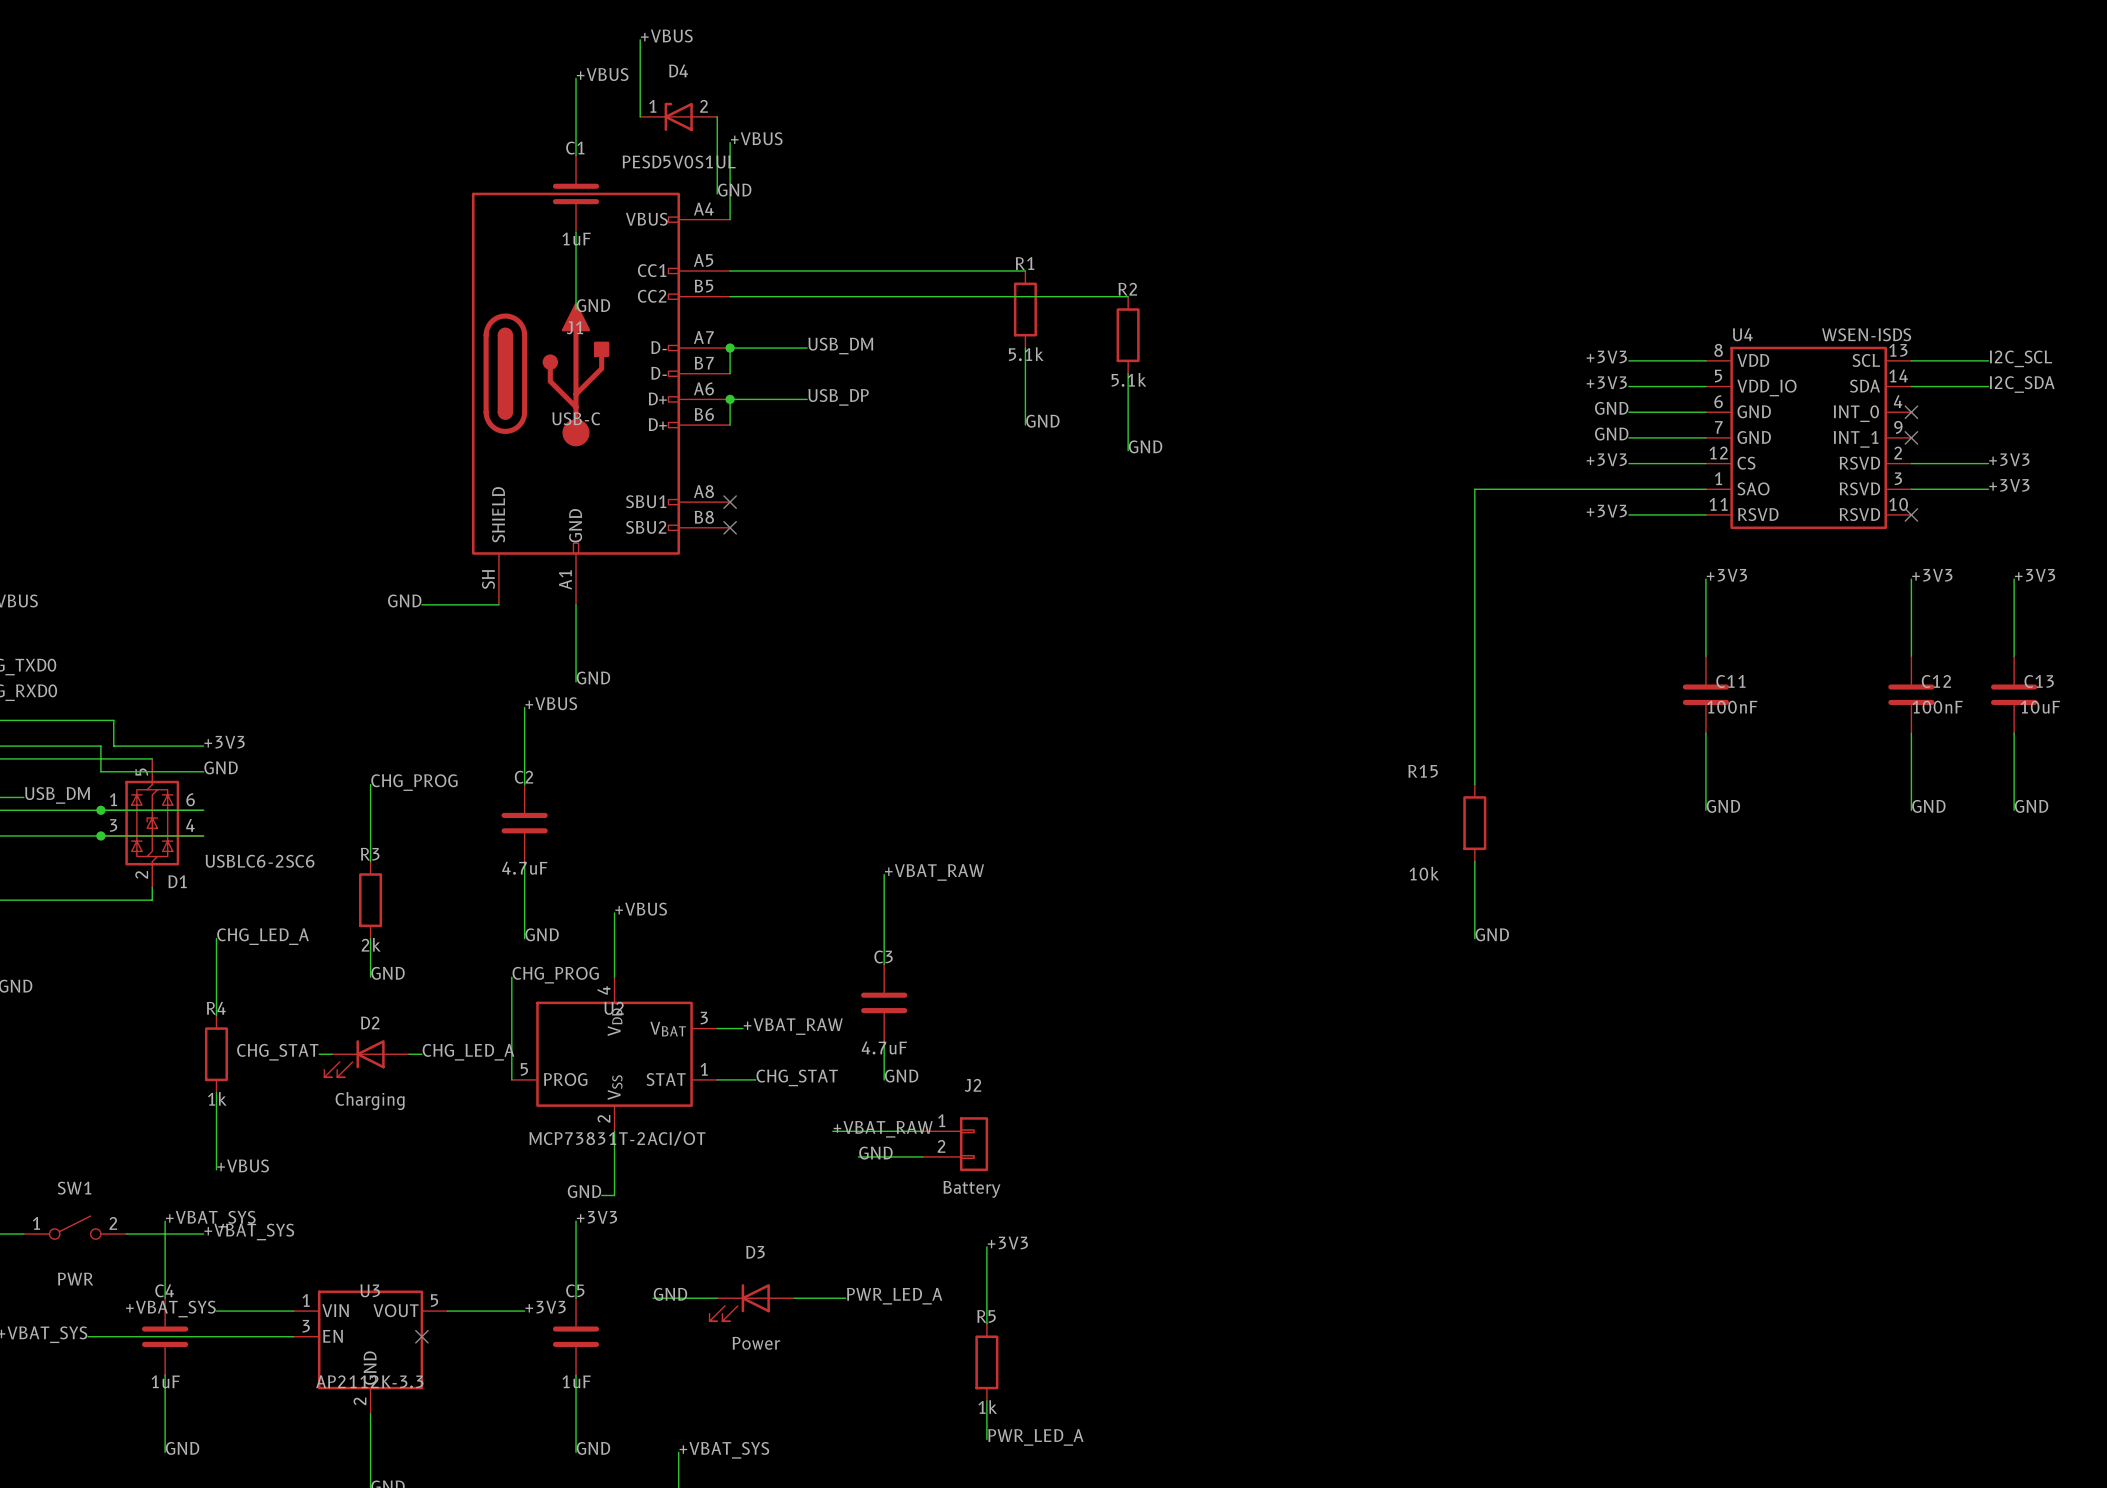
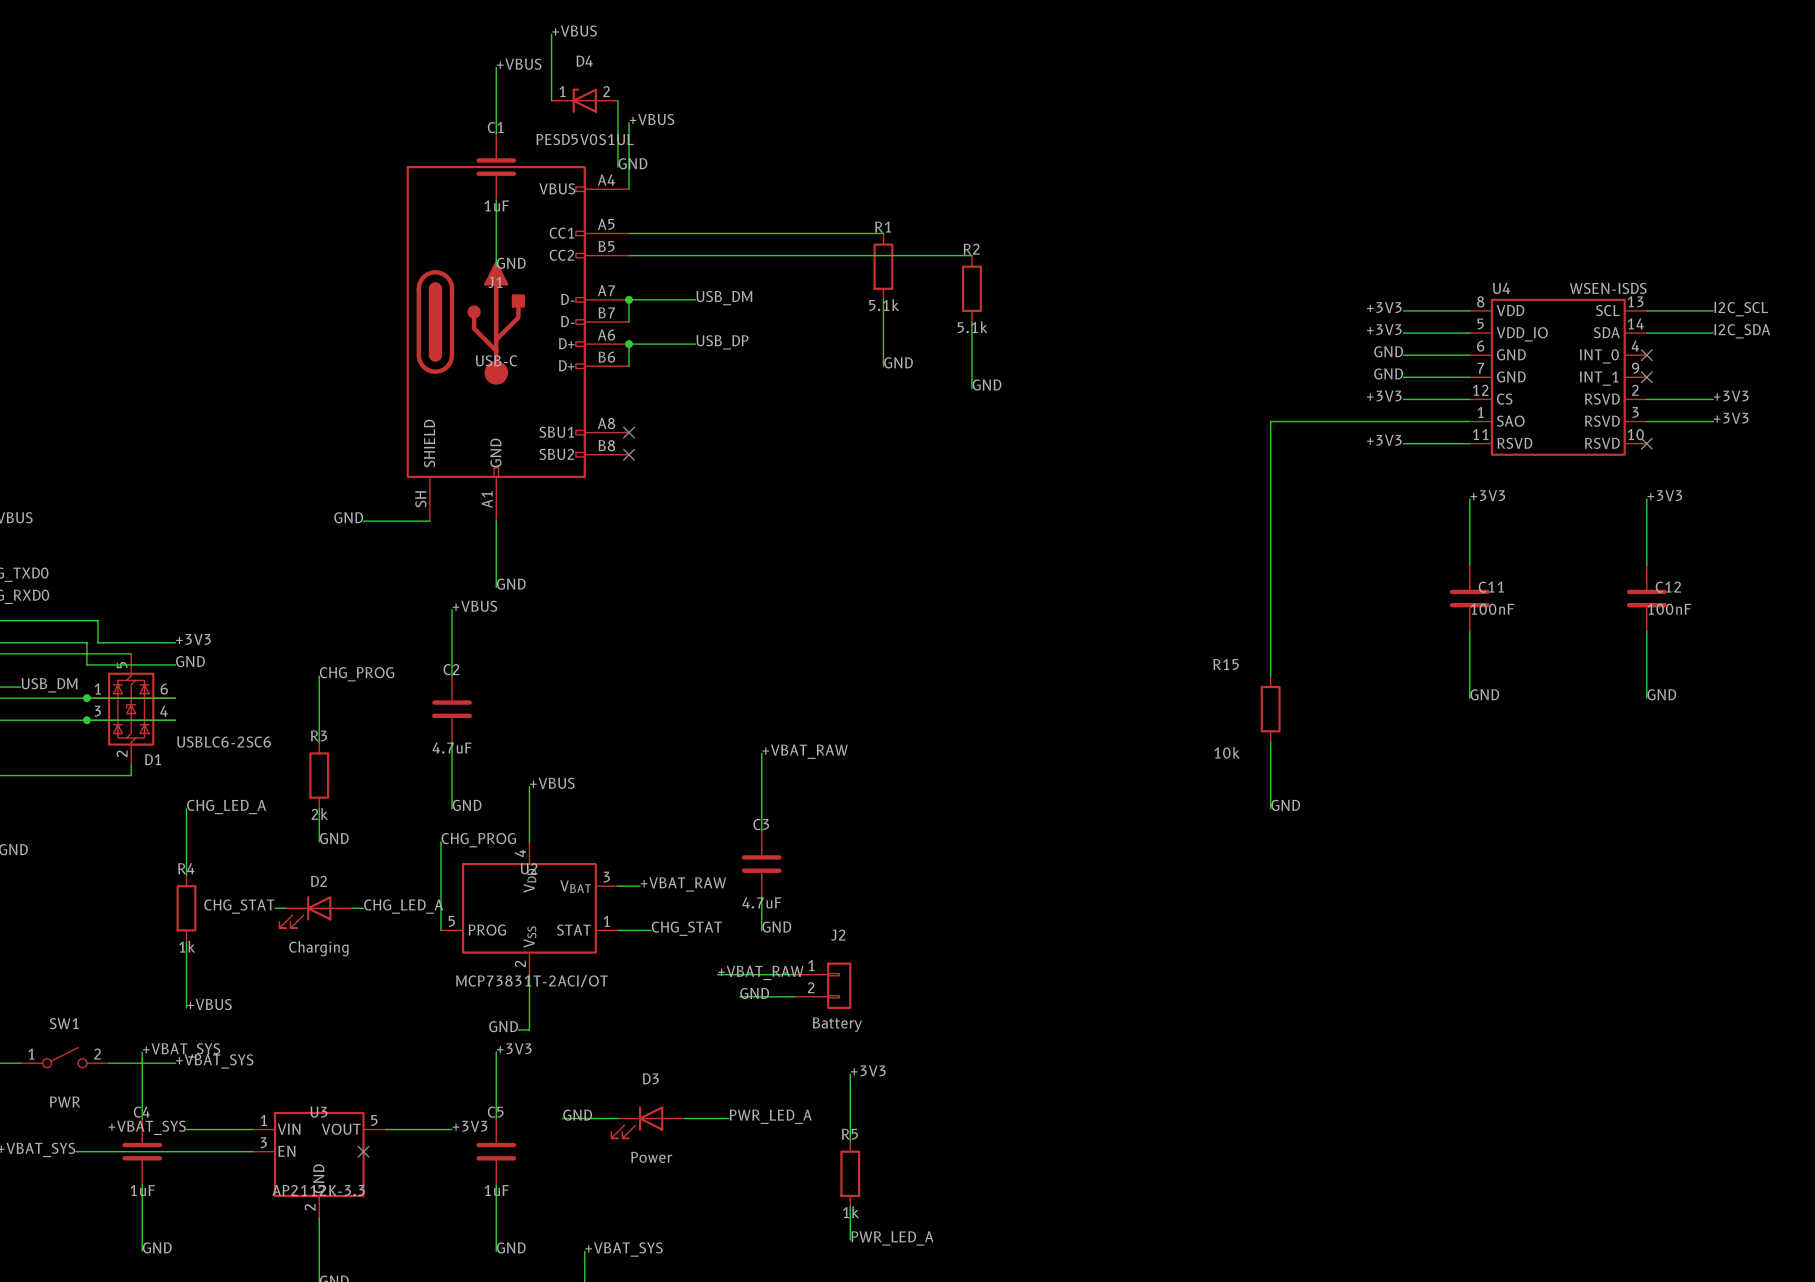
label: +3V3 (2035, 575) -> none
wire: (2014, 579) (2014, 656) -> none
C13: 10uF (2014, 694) -> none
wire: (2014, 733) (2014, 810) -> none
label: GND (2031, 806) -> none

